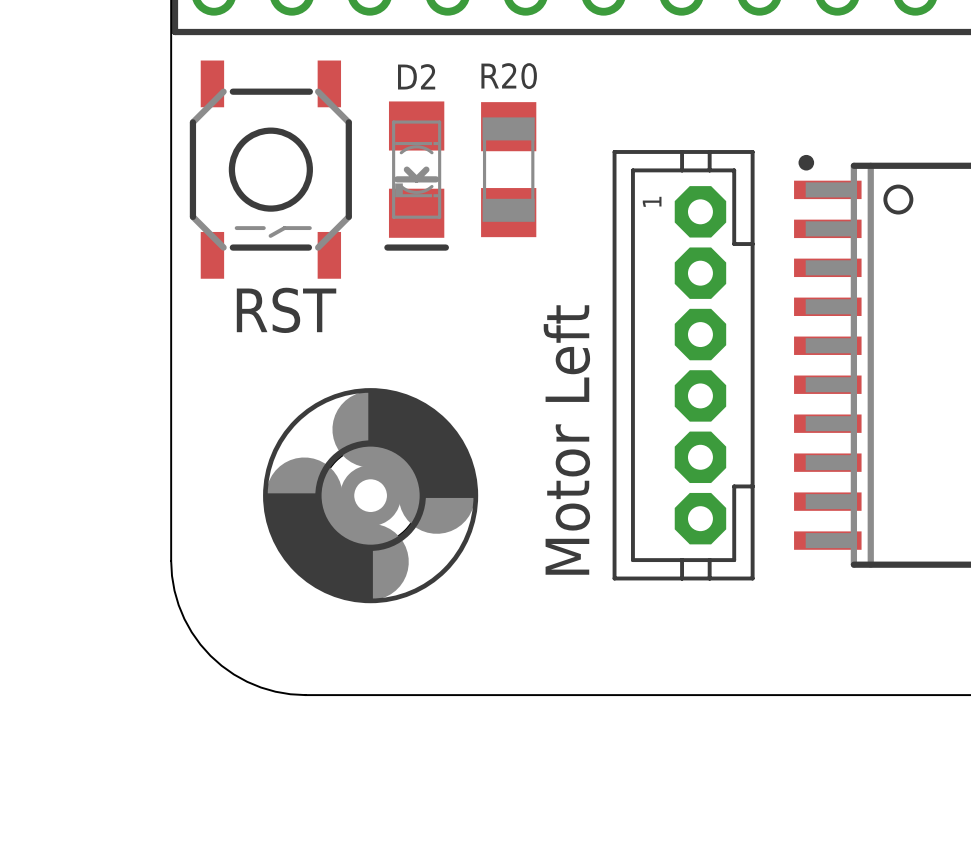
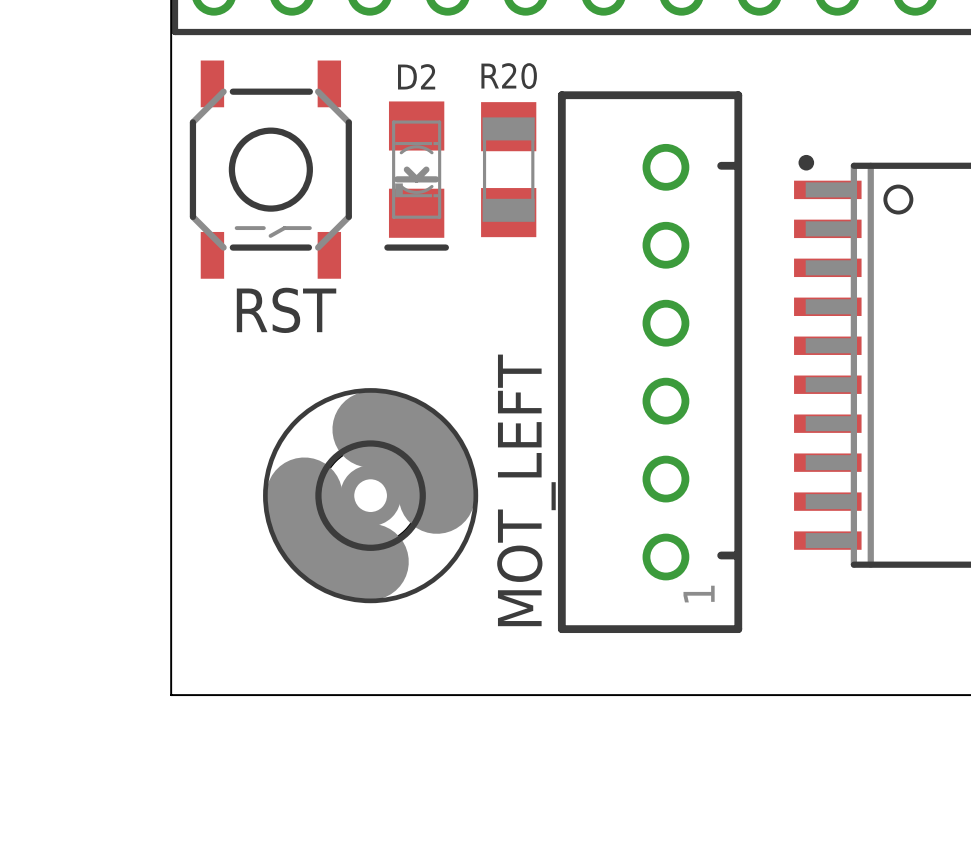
MOT_LEFT: none -> (650, 362)
part: (683, 365) -> none
drawing: [264, 389, 477, 602] -> none
text: Motor Left (566, 439) -> none
board edge: (171, 560) (172, 575) (178, 605) (191, 632) (210, 655) (233, 674) (261, 687) (290, 694) (305, 695) -> (171, 560) (171, 695) (305, 695)

